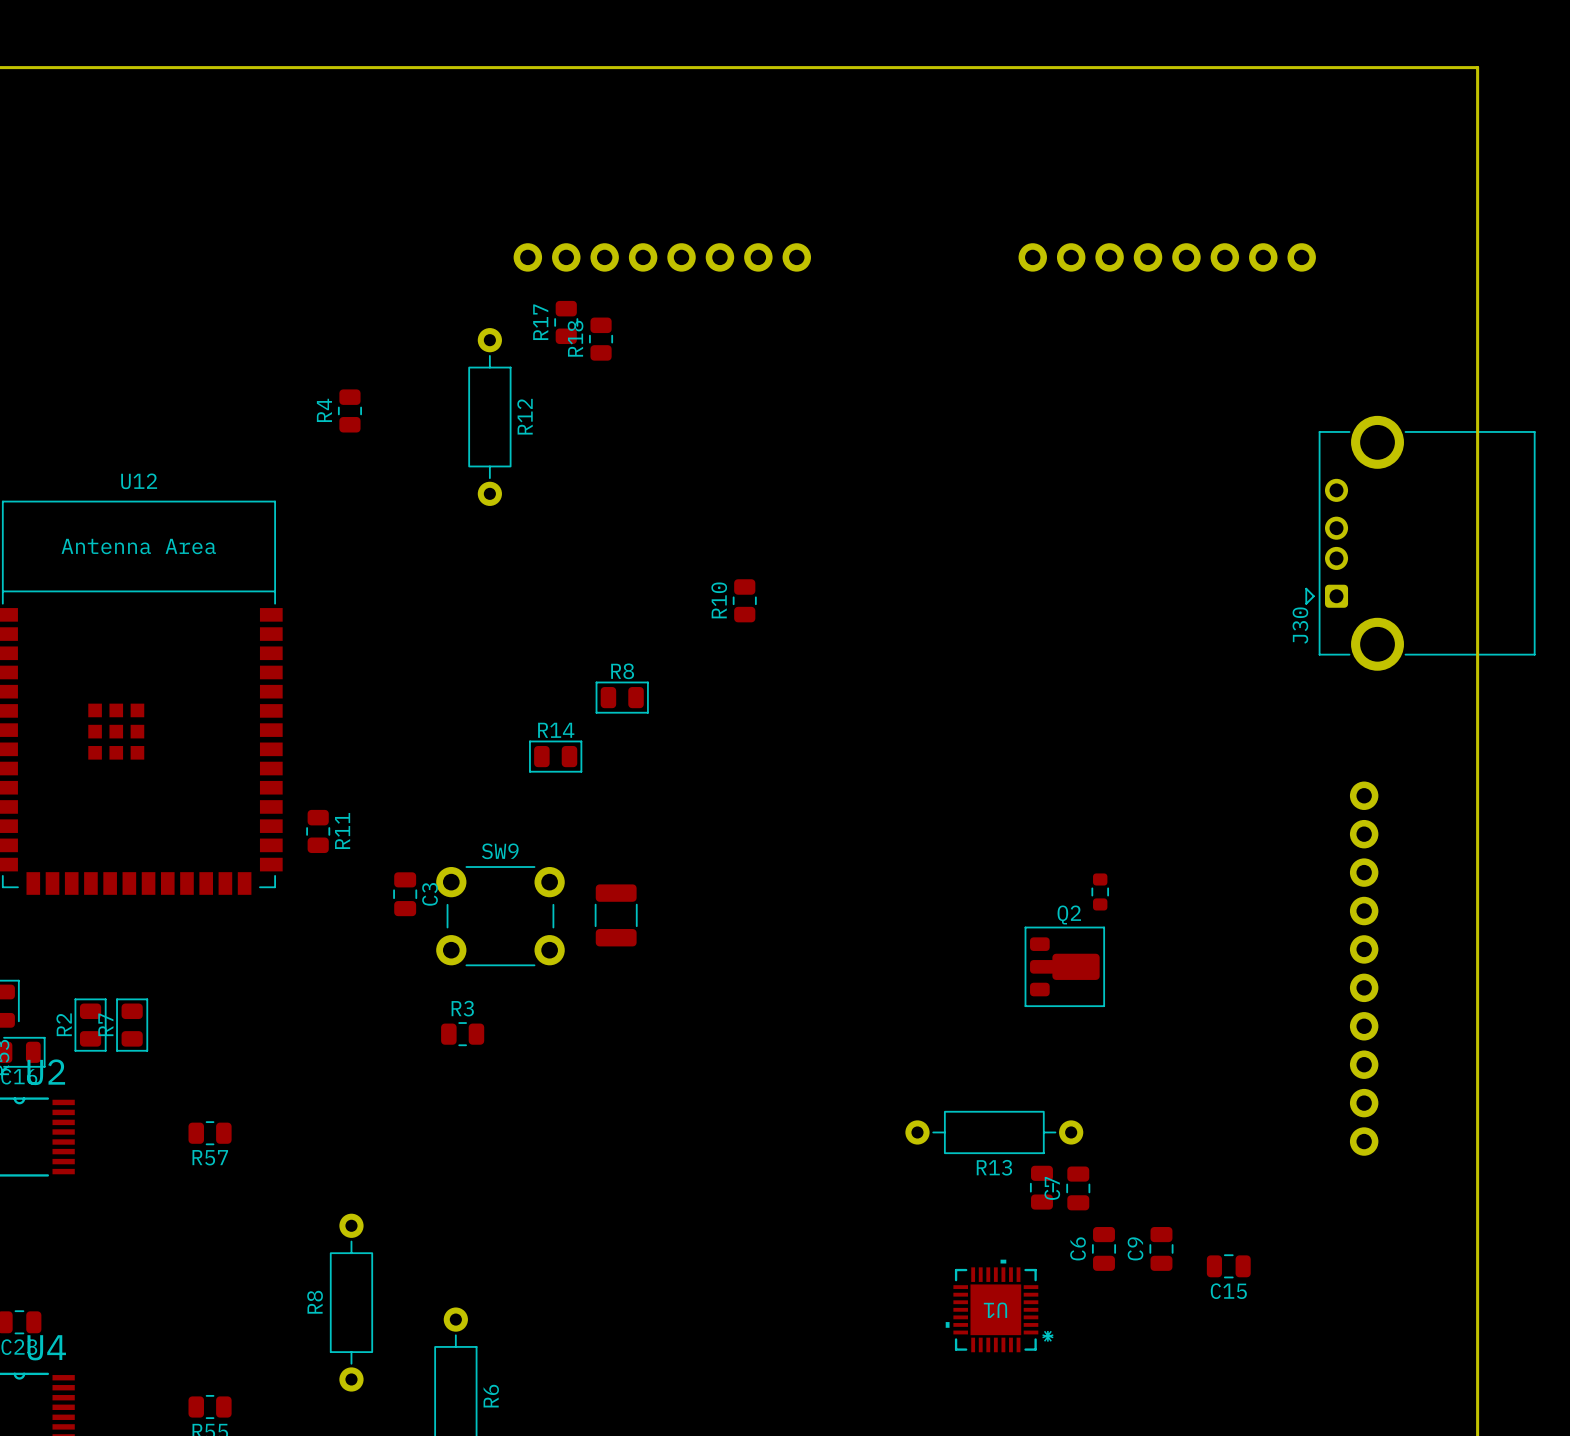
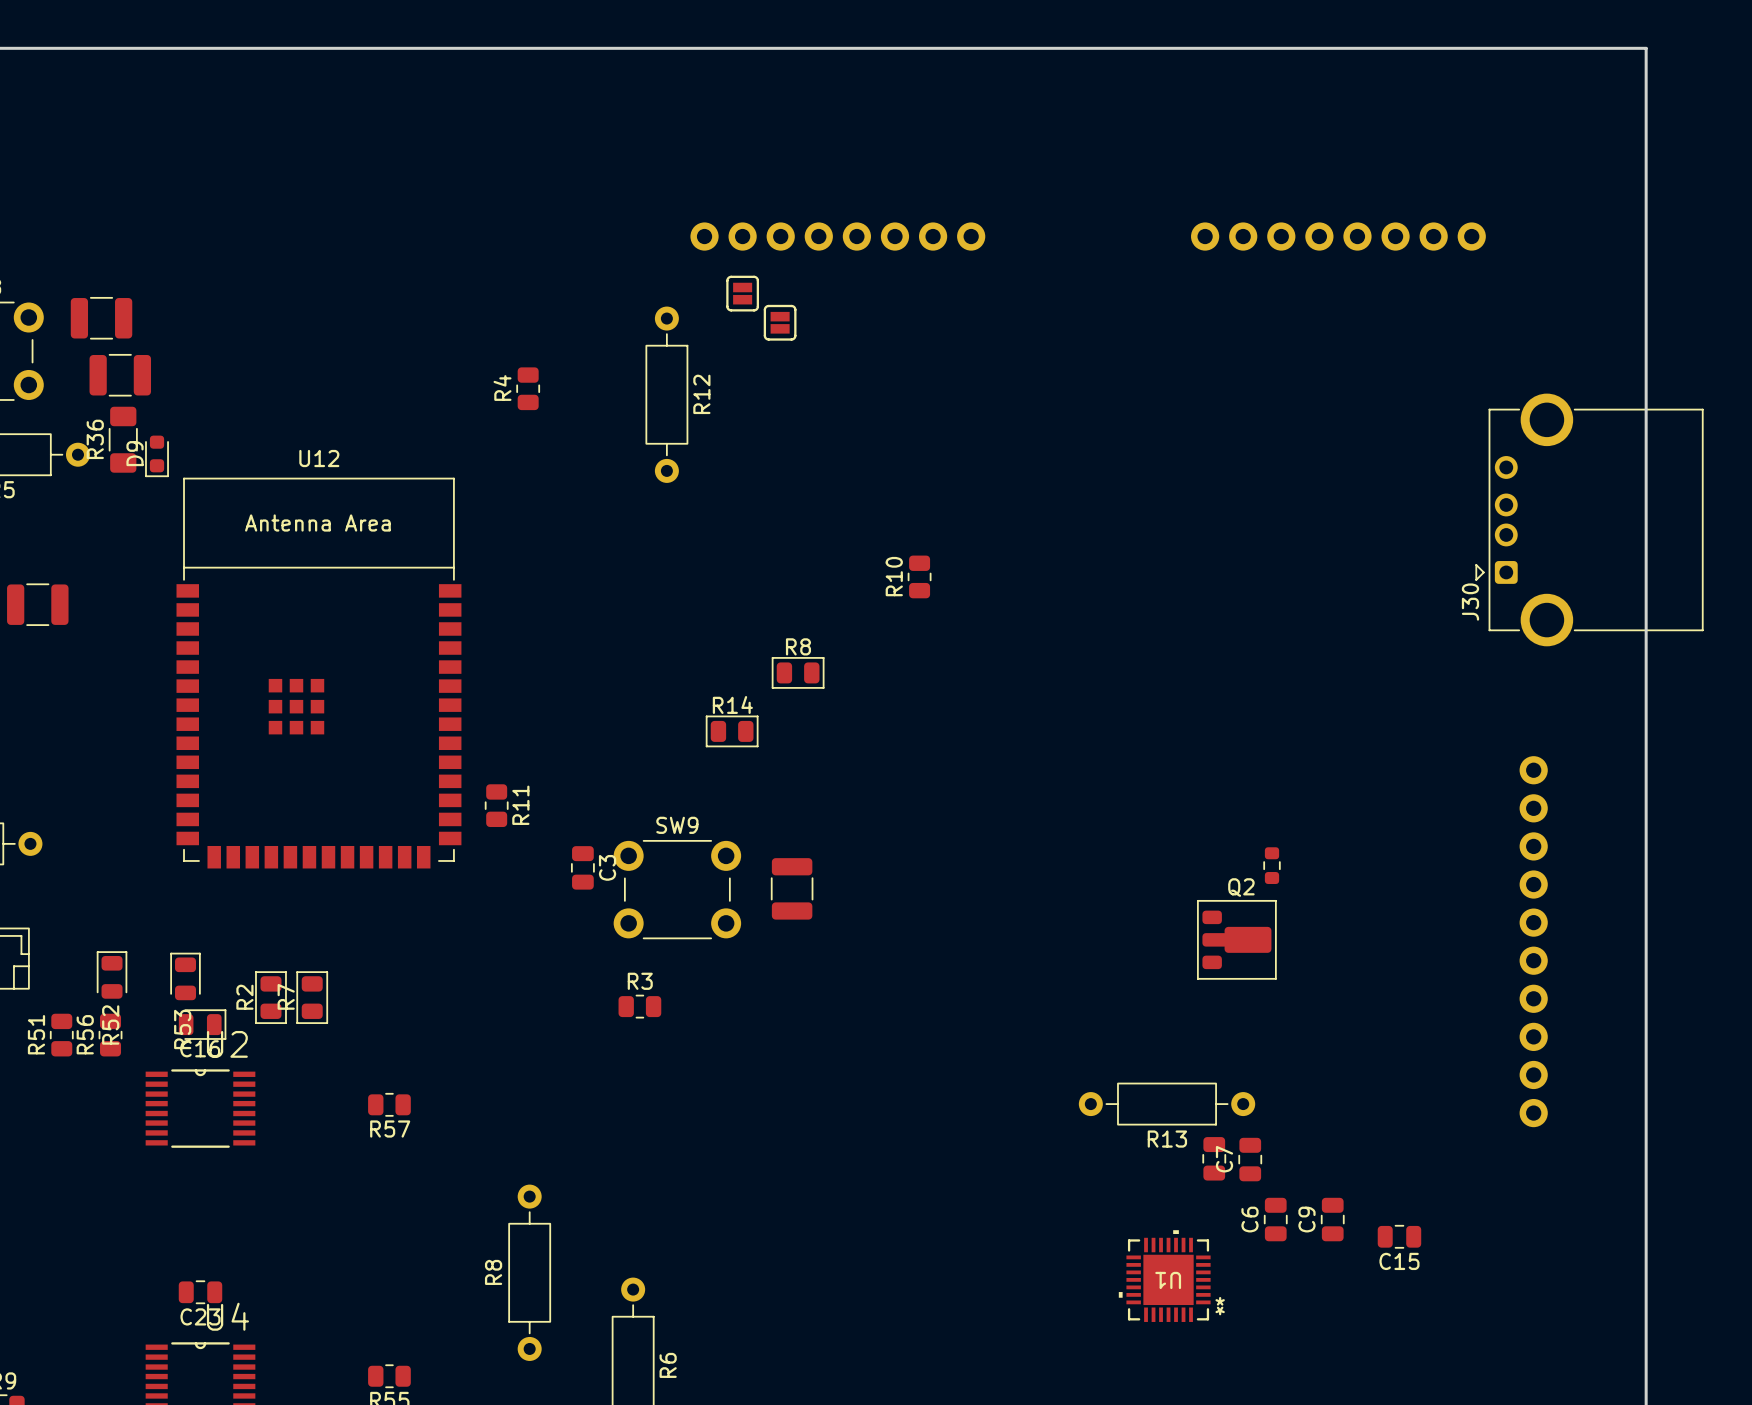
part: none -> (742, 293)
R17: (566, 322) -> none
R18: (601, 339) -> none
part: none -> (780, 322)

